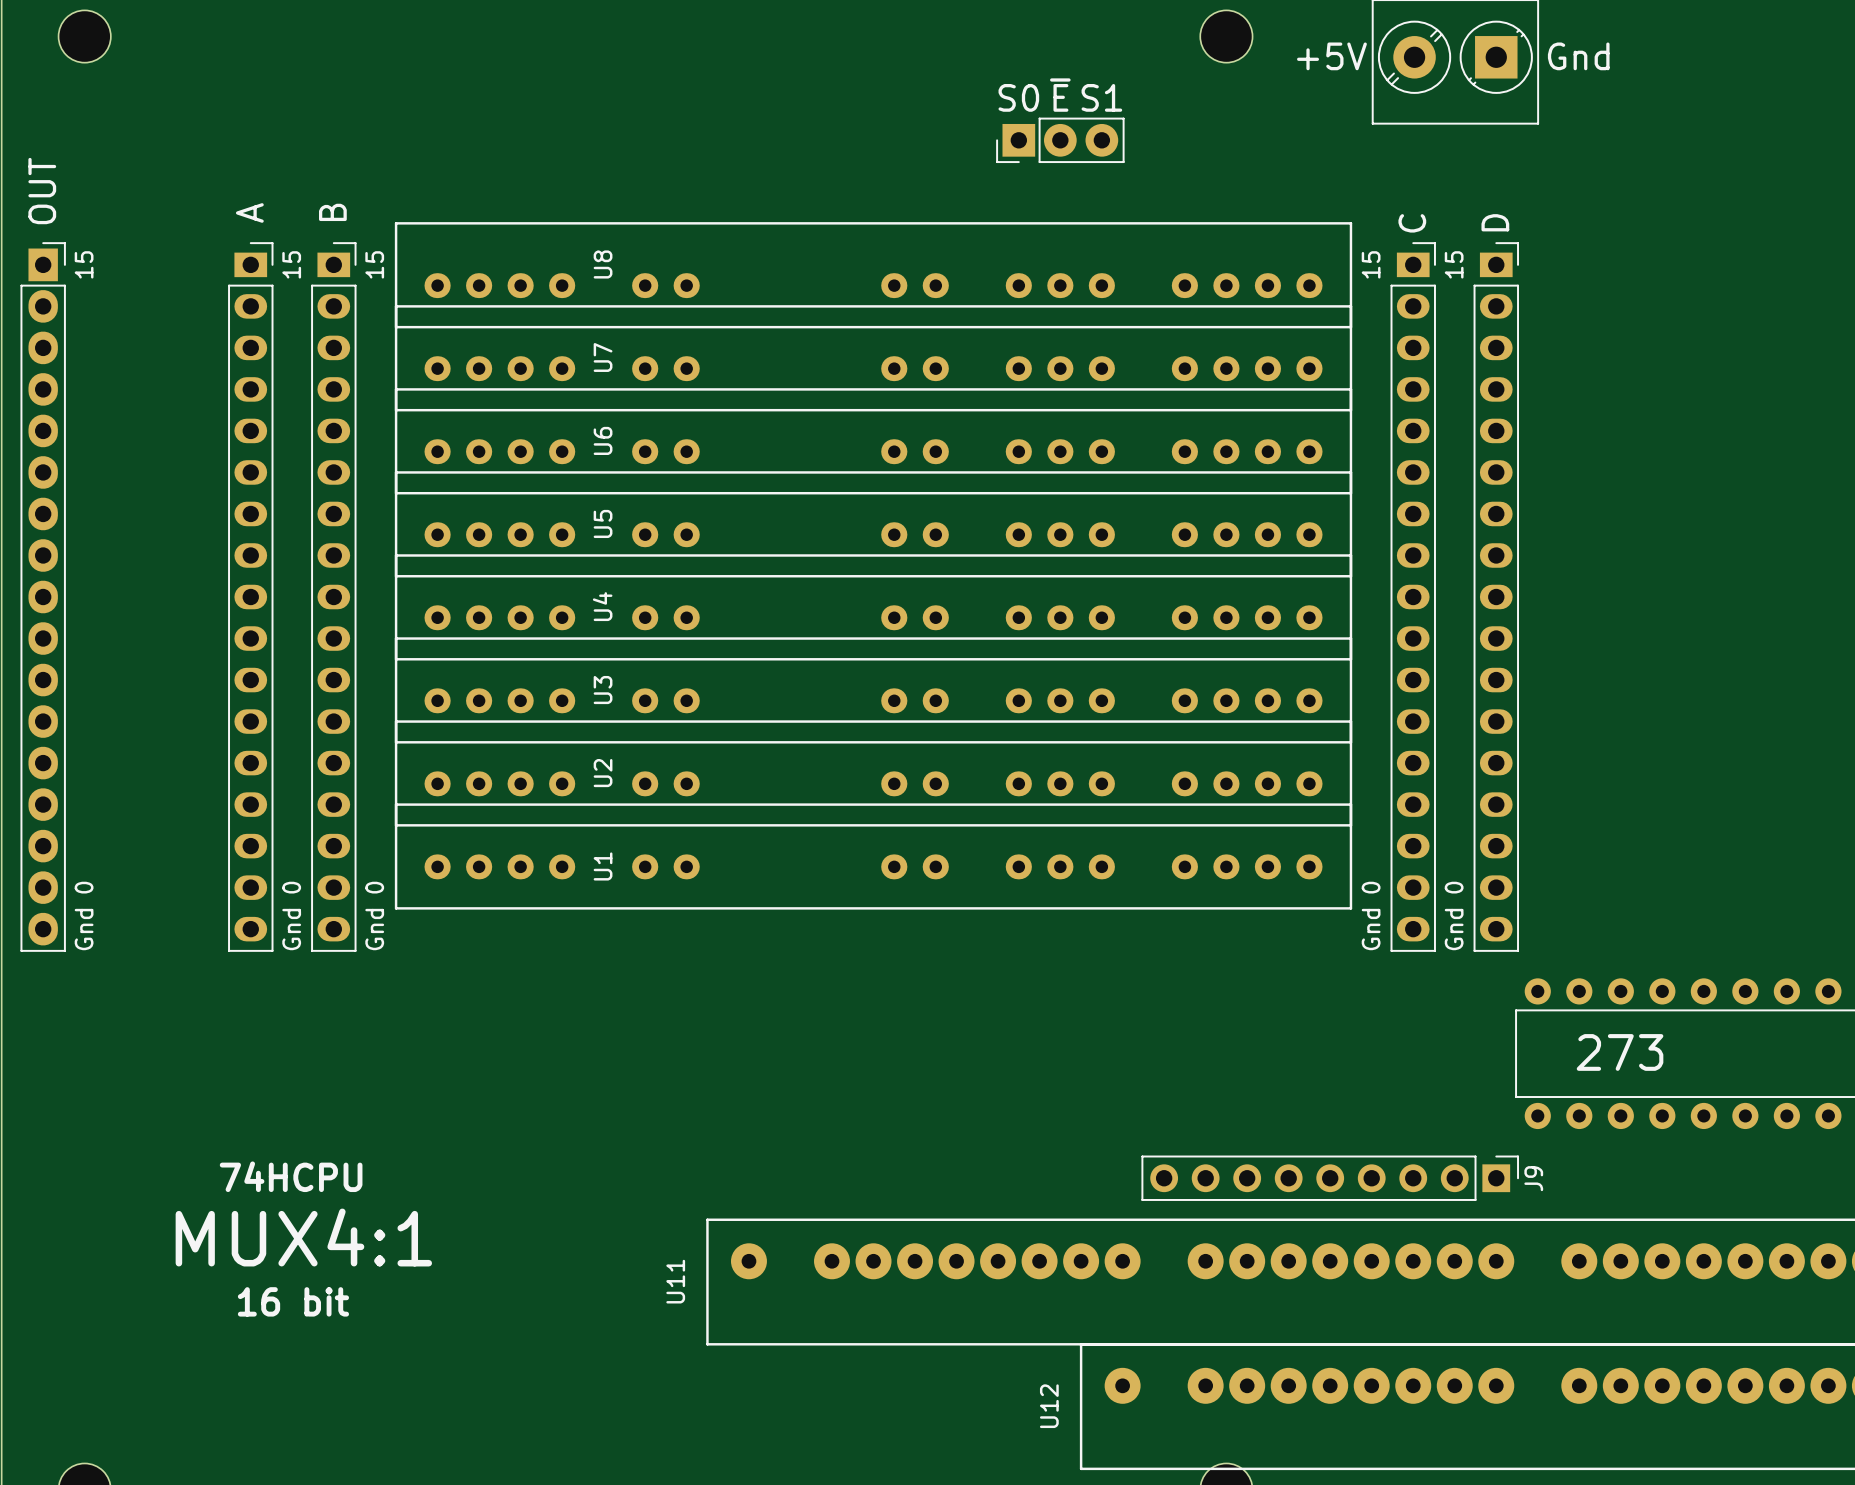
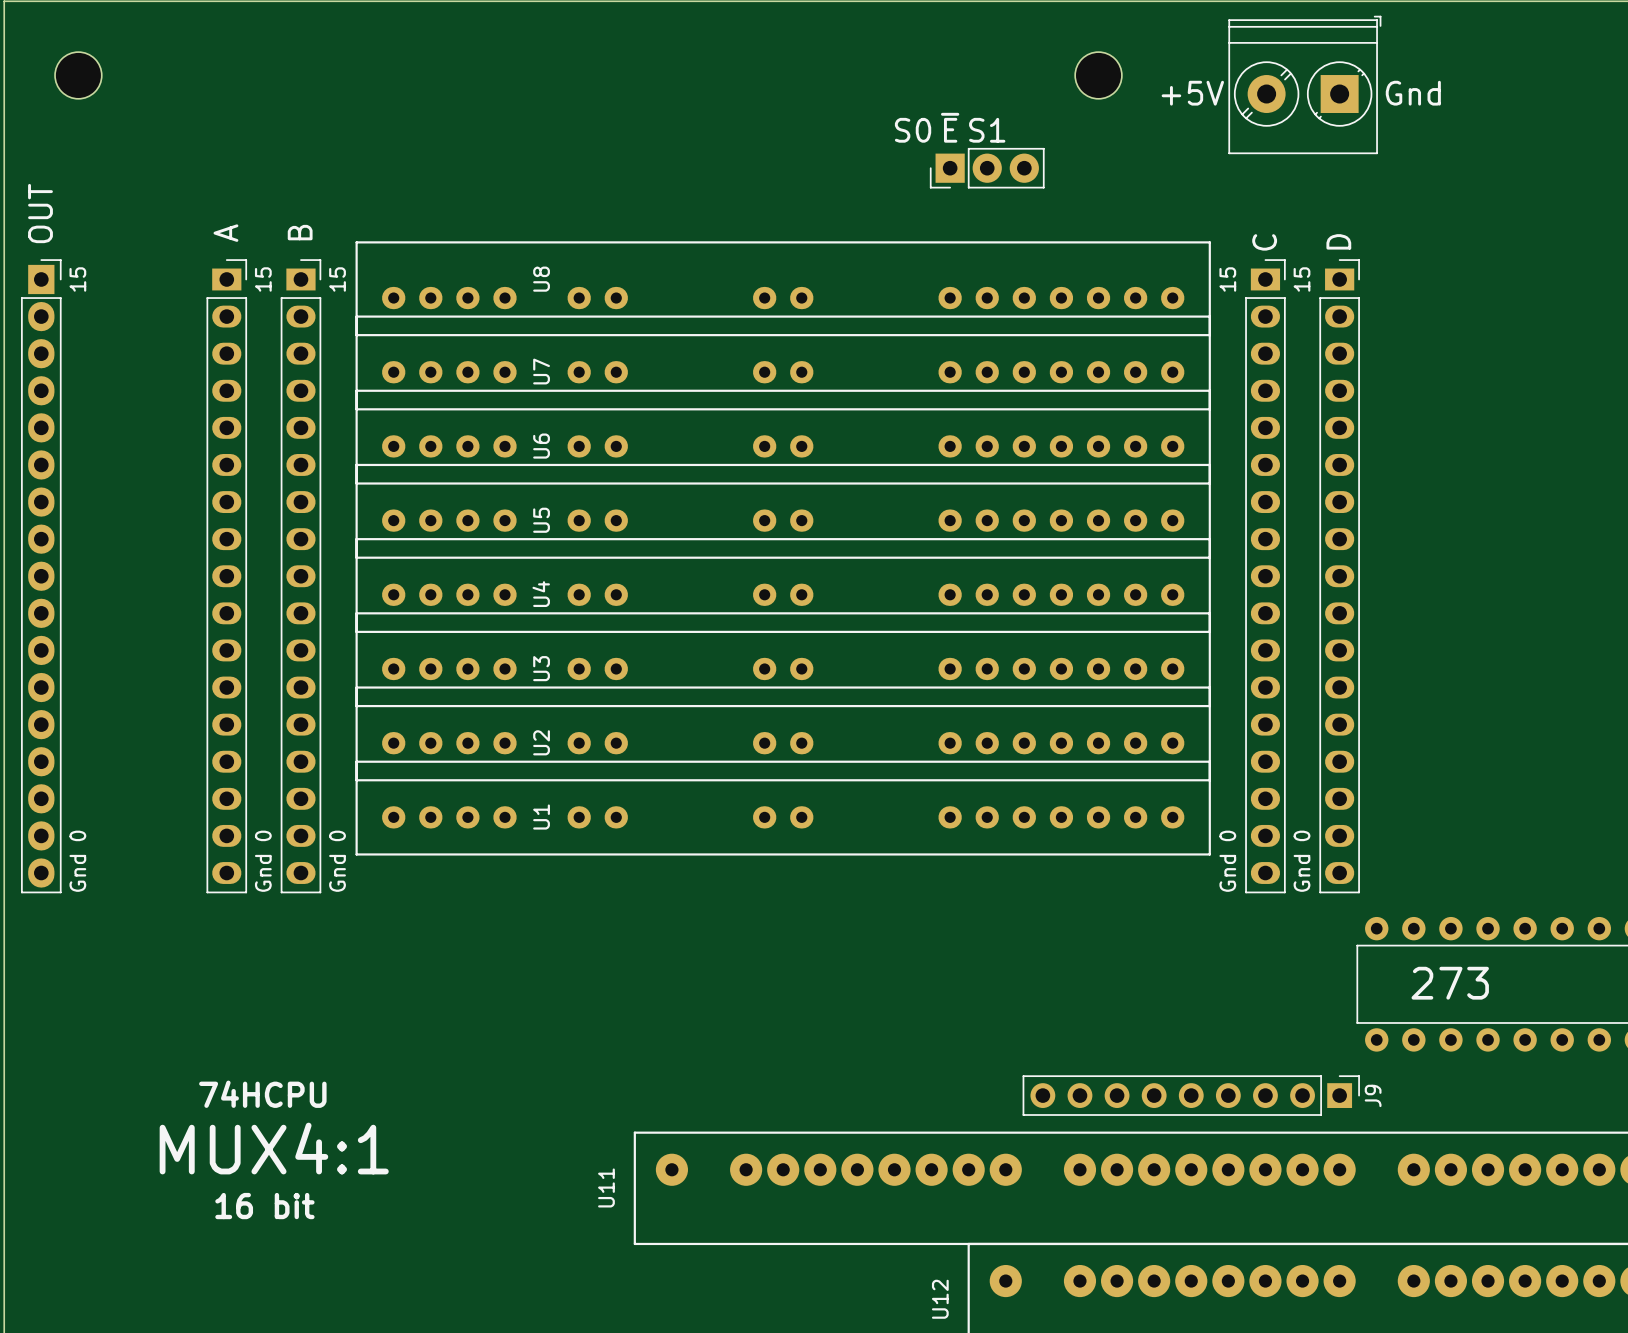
part position: (1060, 140) -> (987, 168)
U8 footprint: [394, 222, 1353, 329] -> [355, 241, 1211, 337]
U7 footprint: [394, 305, 1353, 412] -> [355, 315, 1211, 411]
U6 footprint: [394, 388, 1353, 495] -> [355, 389, 1211, 485]
U5 footprint: [394, 471, 1353, 578] -> [355, 463, 1211, 559]
U4 footprint: [394, 554, 1353, 661] -> [355, 538, 1211, 633]
U3 footprint: [394, 637, 1353, 744] -> [355, 612, 1211, 708]
U2 footprint: [394, 720, 1353, 827] -> [355, 686, 1211, 782]
U1 footprint: [394, 803, 1353, 910] -> [355, 760, 1211, 856]

